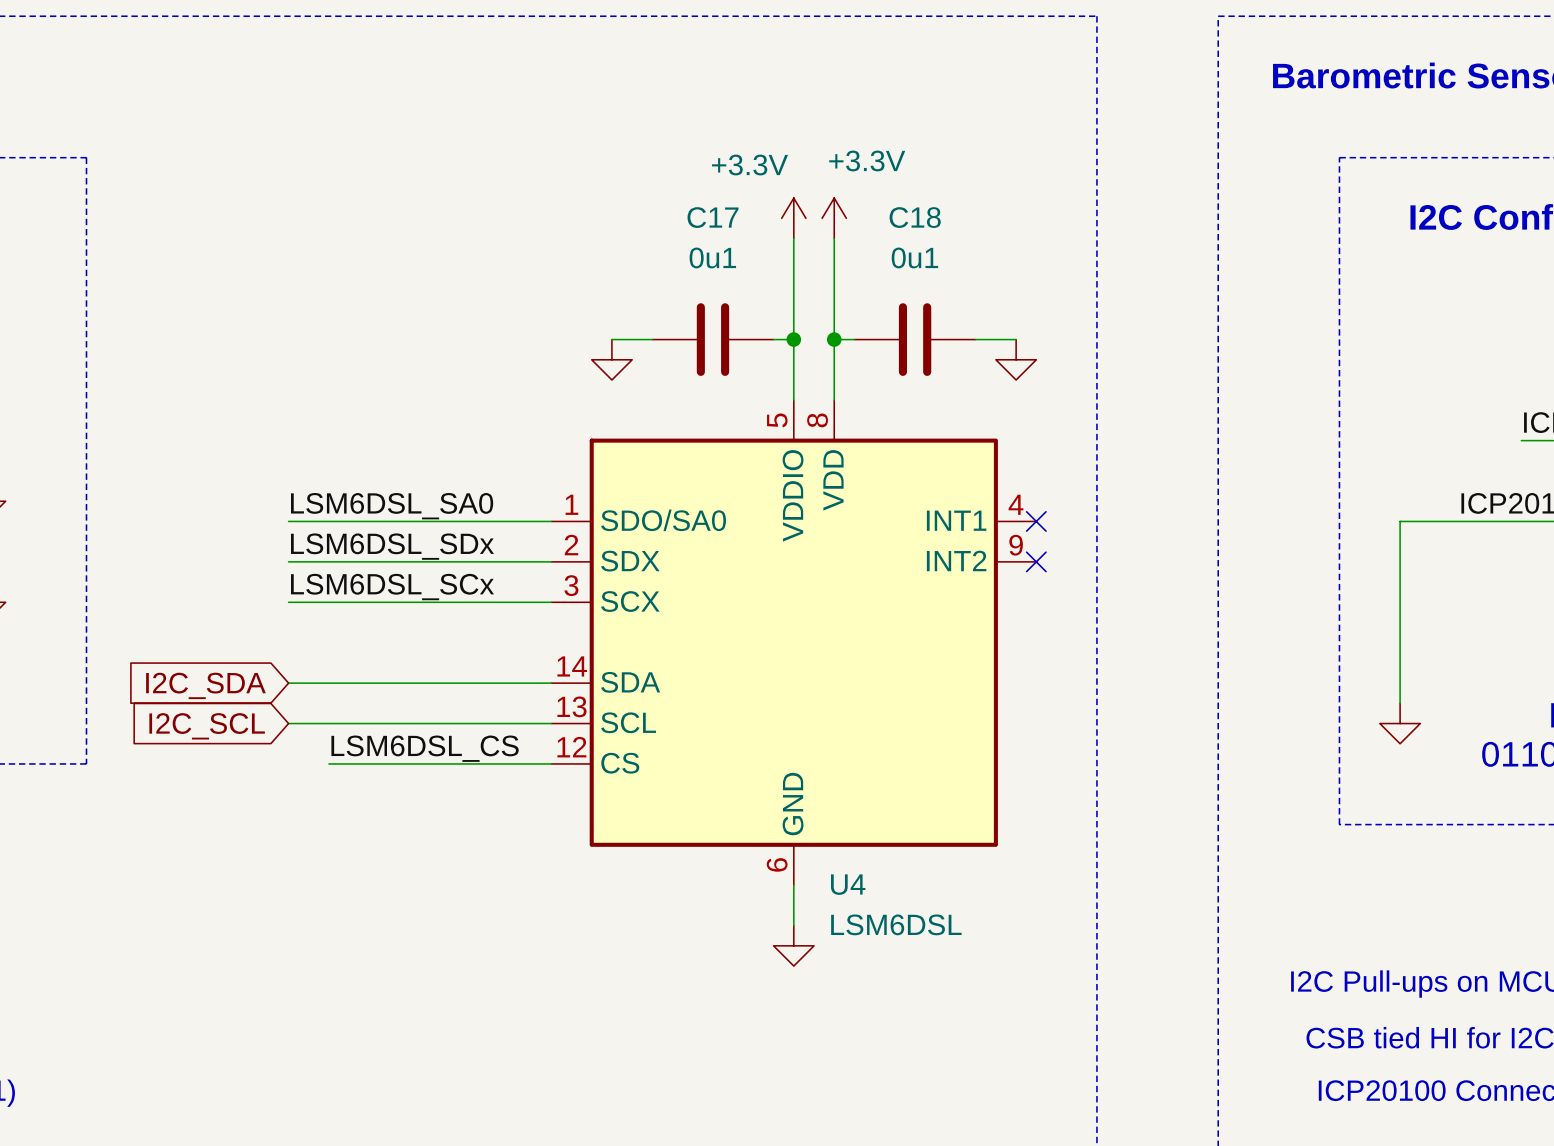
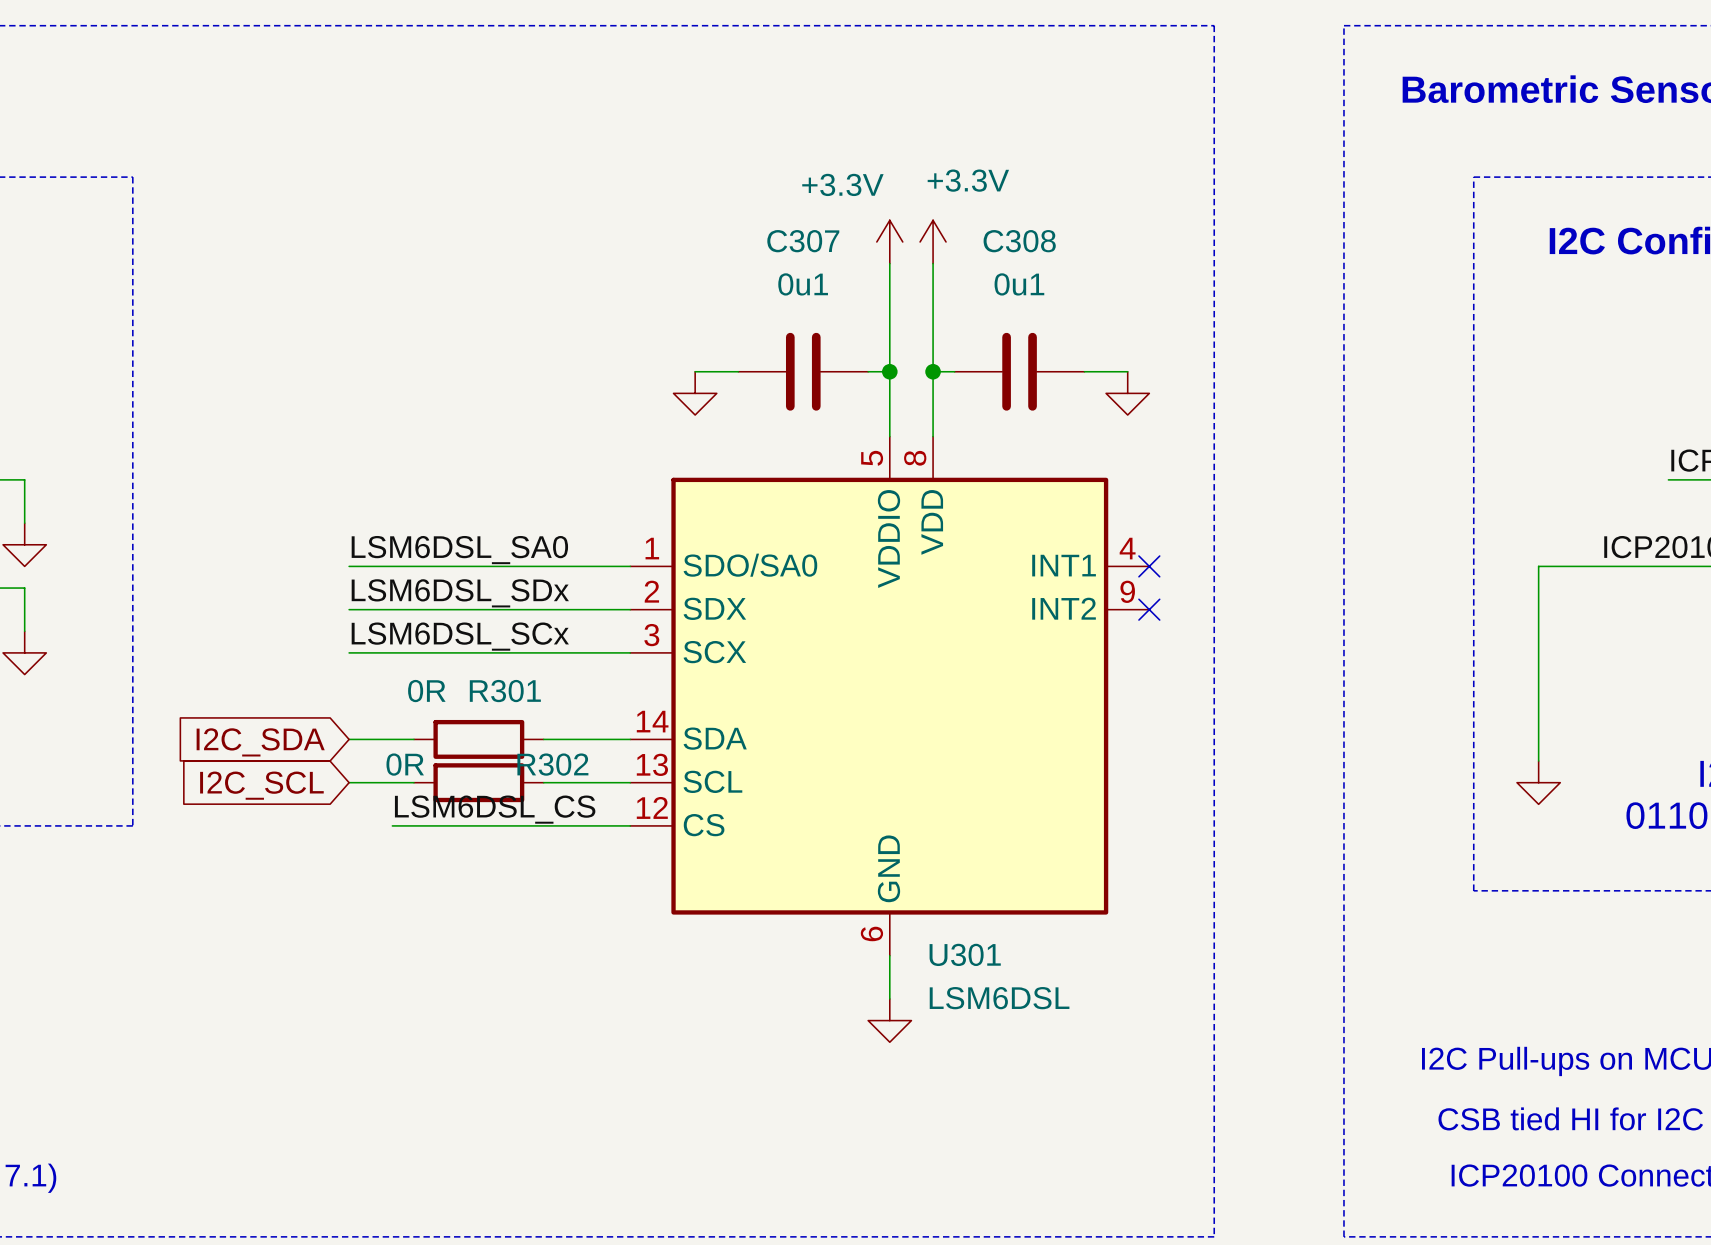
C17 name: C17 (712, 217) -> C307 (803, 241)
C18 name: C18 (915, 217) -> C308 (1019, 241)
wire: (349, 683) (470, 683) -> none
R301: none -> 0R (478, 739)
wire: (349, 723) (470, 723) -> none
R302: none -> 0R (478, 782)
U4 name: U4 (848, 884) -> U301 (965, 954)

